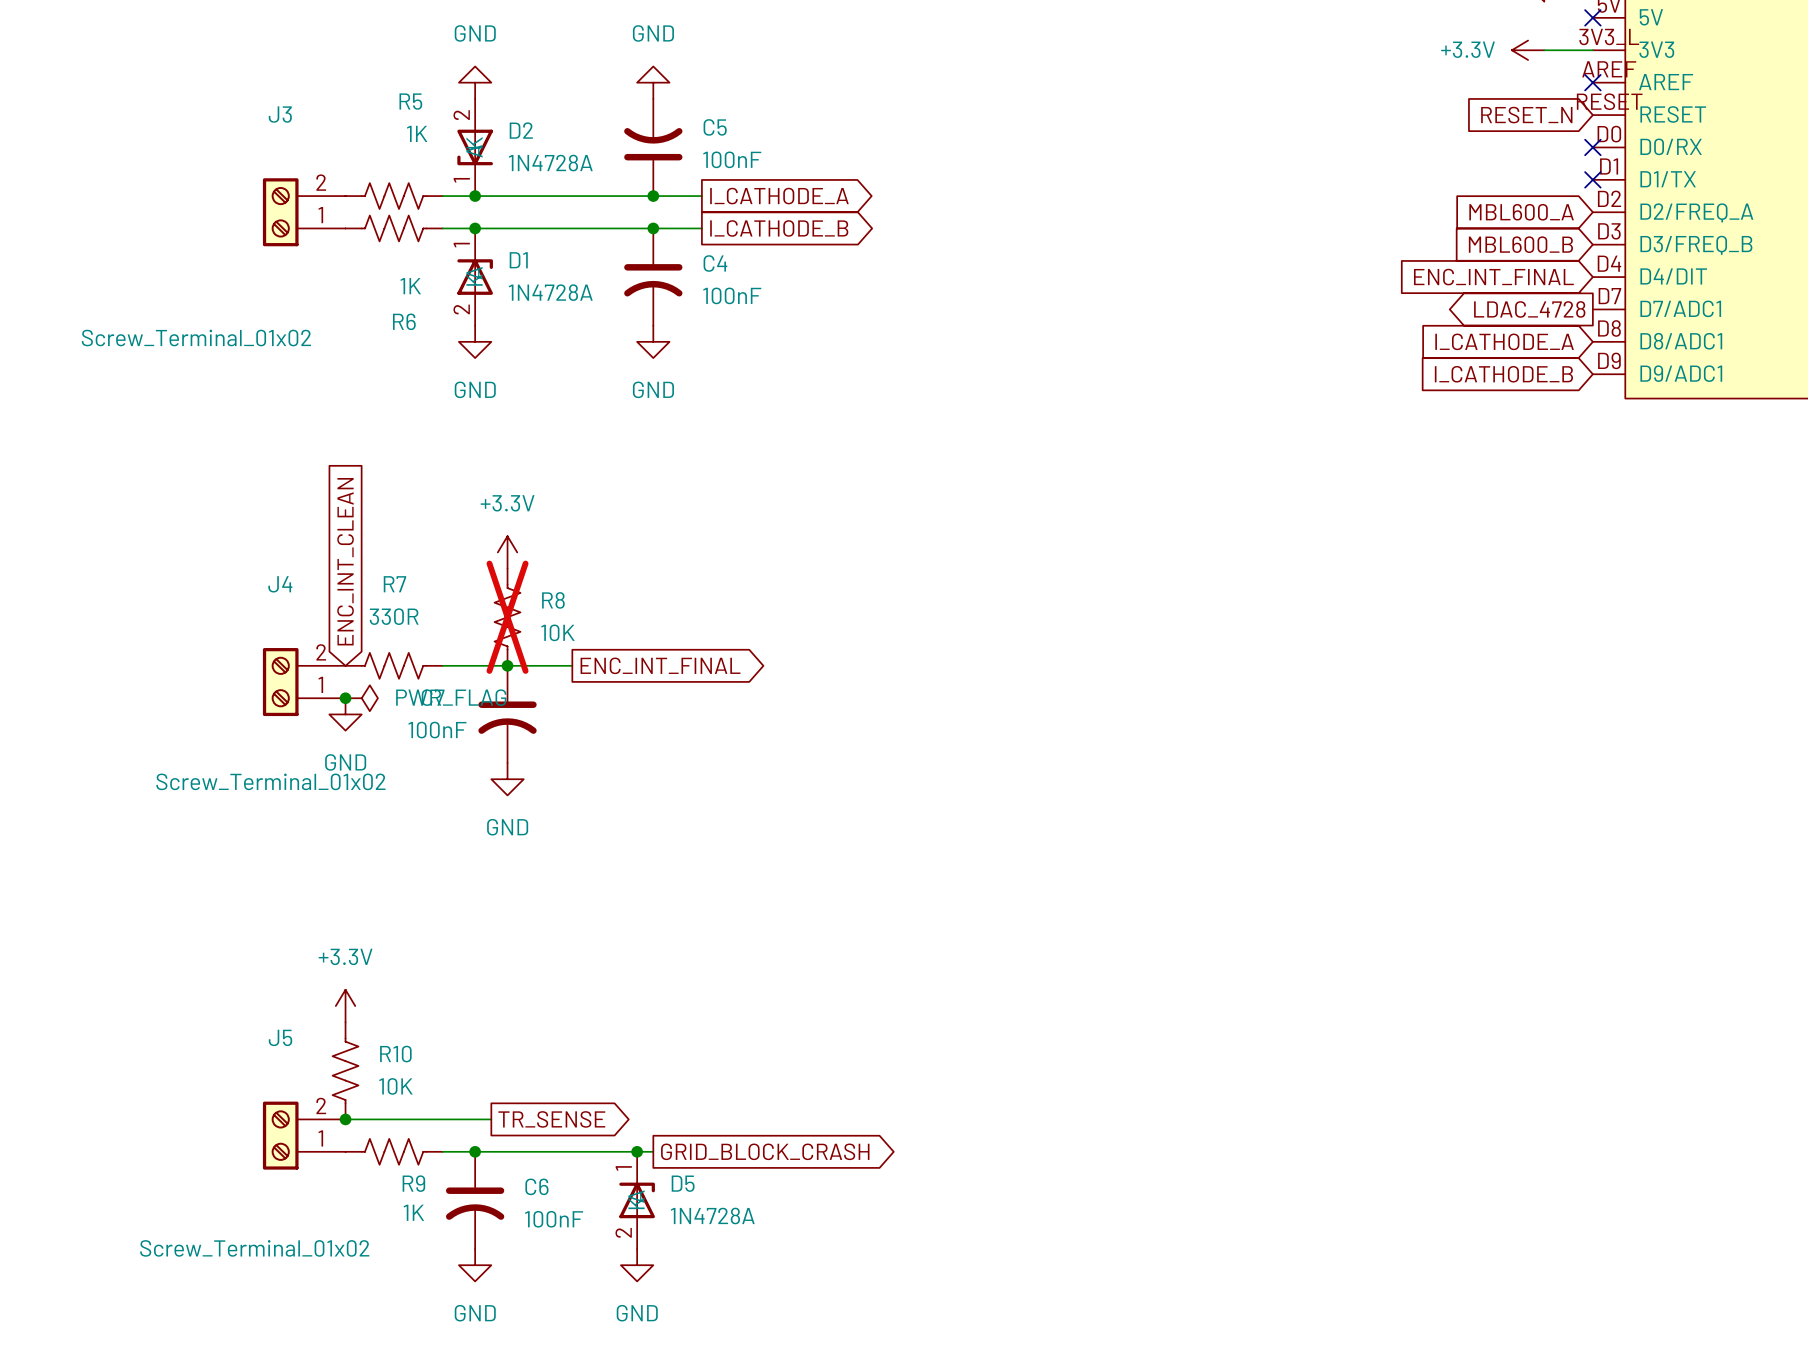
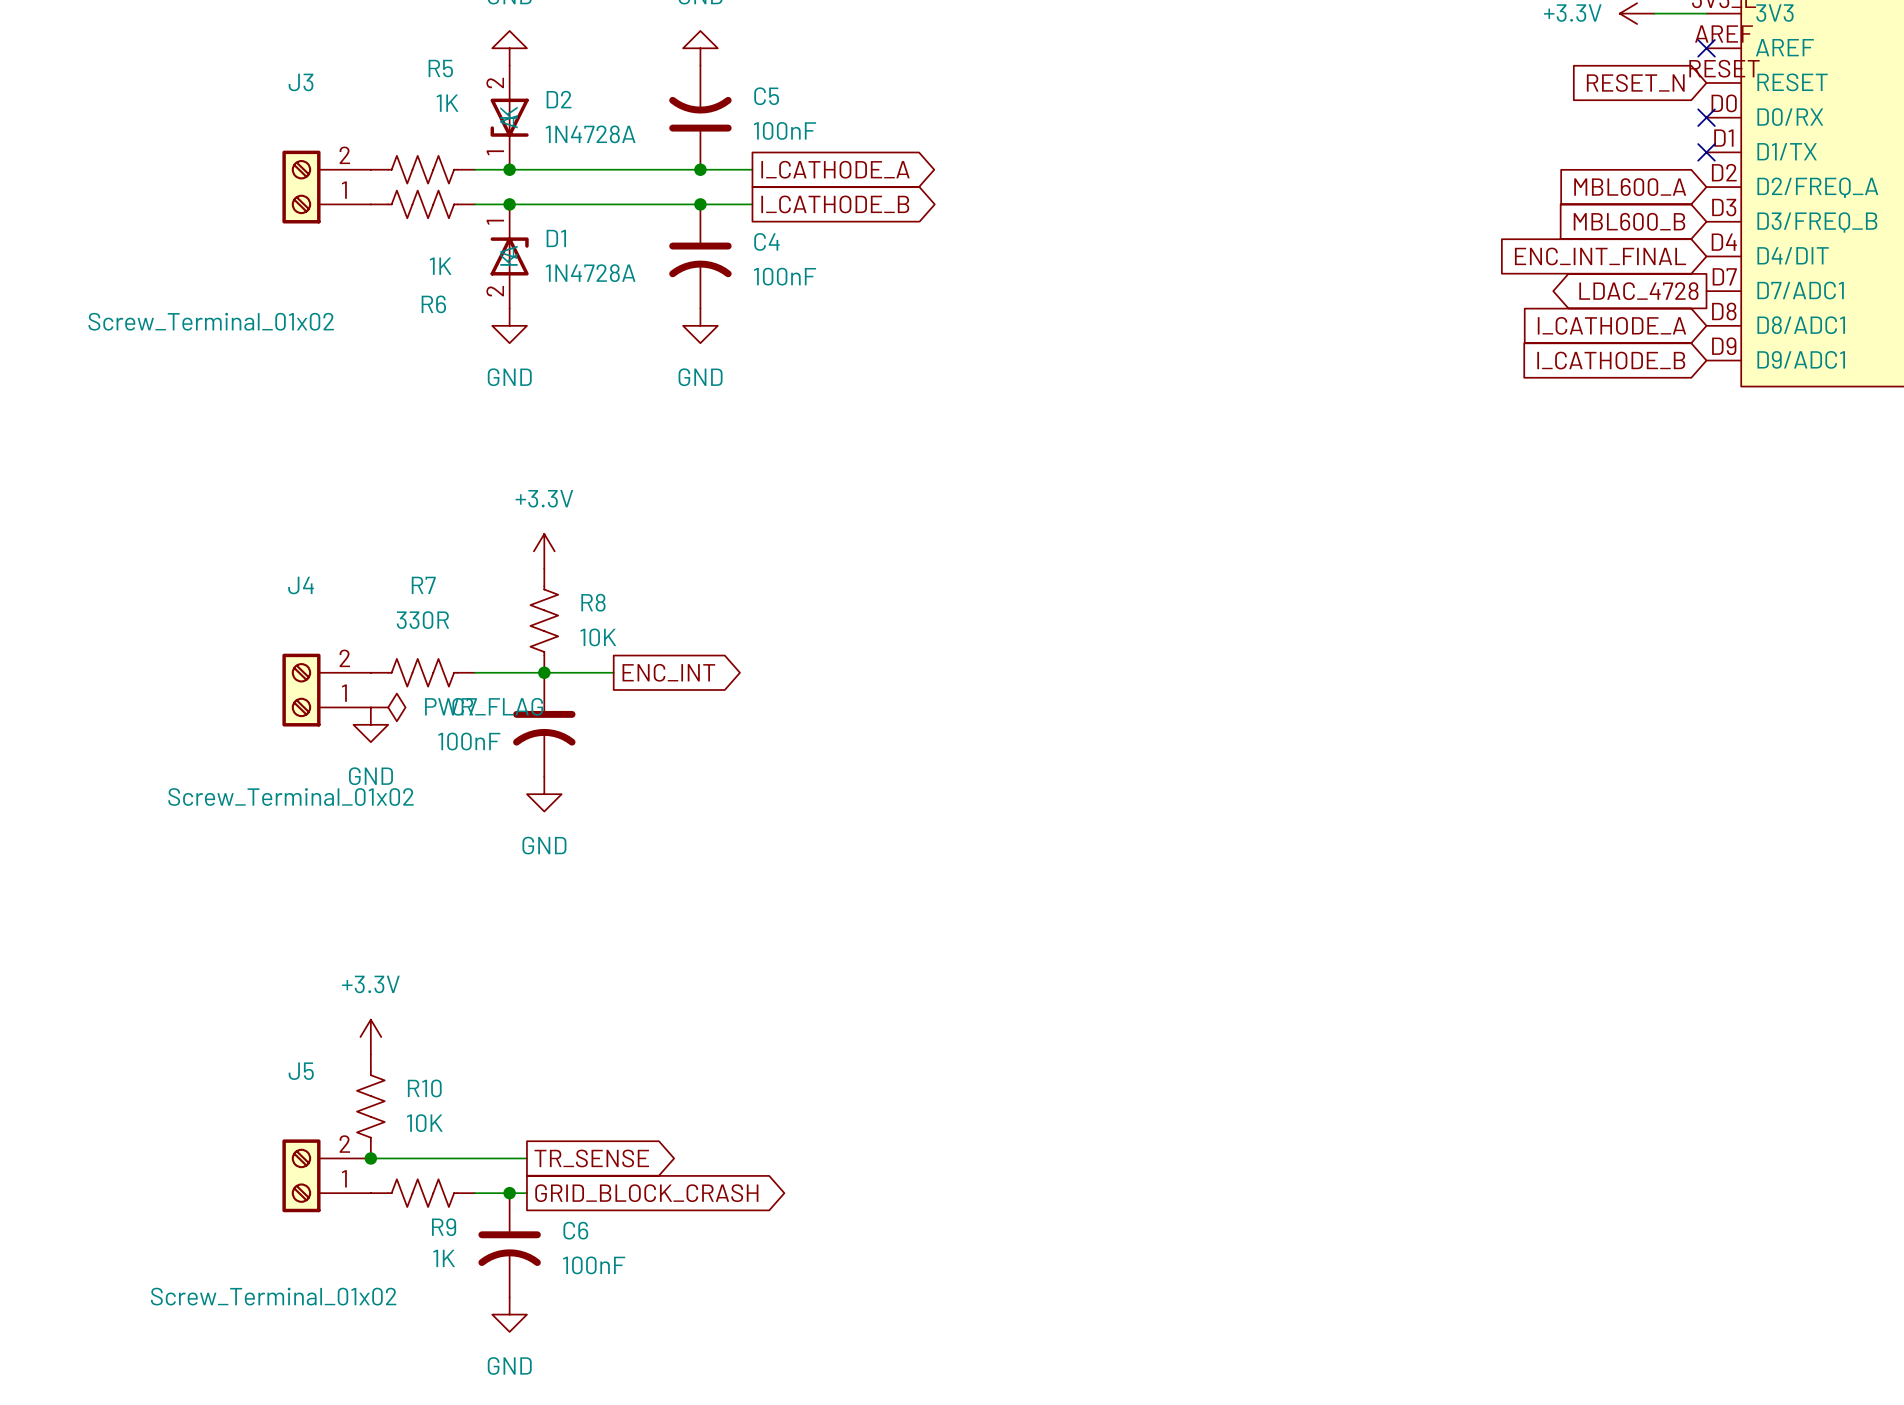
global label: ENC_INT_CLEAN (345, 561) -> none
R8 do-not-place cross: (507, 617) -> none
global label: ENC_INT_FINAL (660, 665) -> ENC_INT (668, 672)
junction: (345, 698) -> none
wire: (491, 1151) (653, 1151) -> none
junction: (637, 1151) -> none
global label position: GRID_BLOCK_CRASH (765, 1151) -> GRID_BLOCK_CRASH (646, 1193)
D5: 1N4728A (637, 1200) -> none
power symbol: GND (637, 1265) -> none

